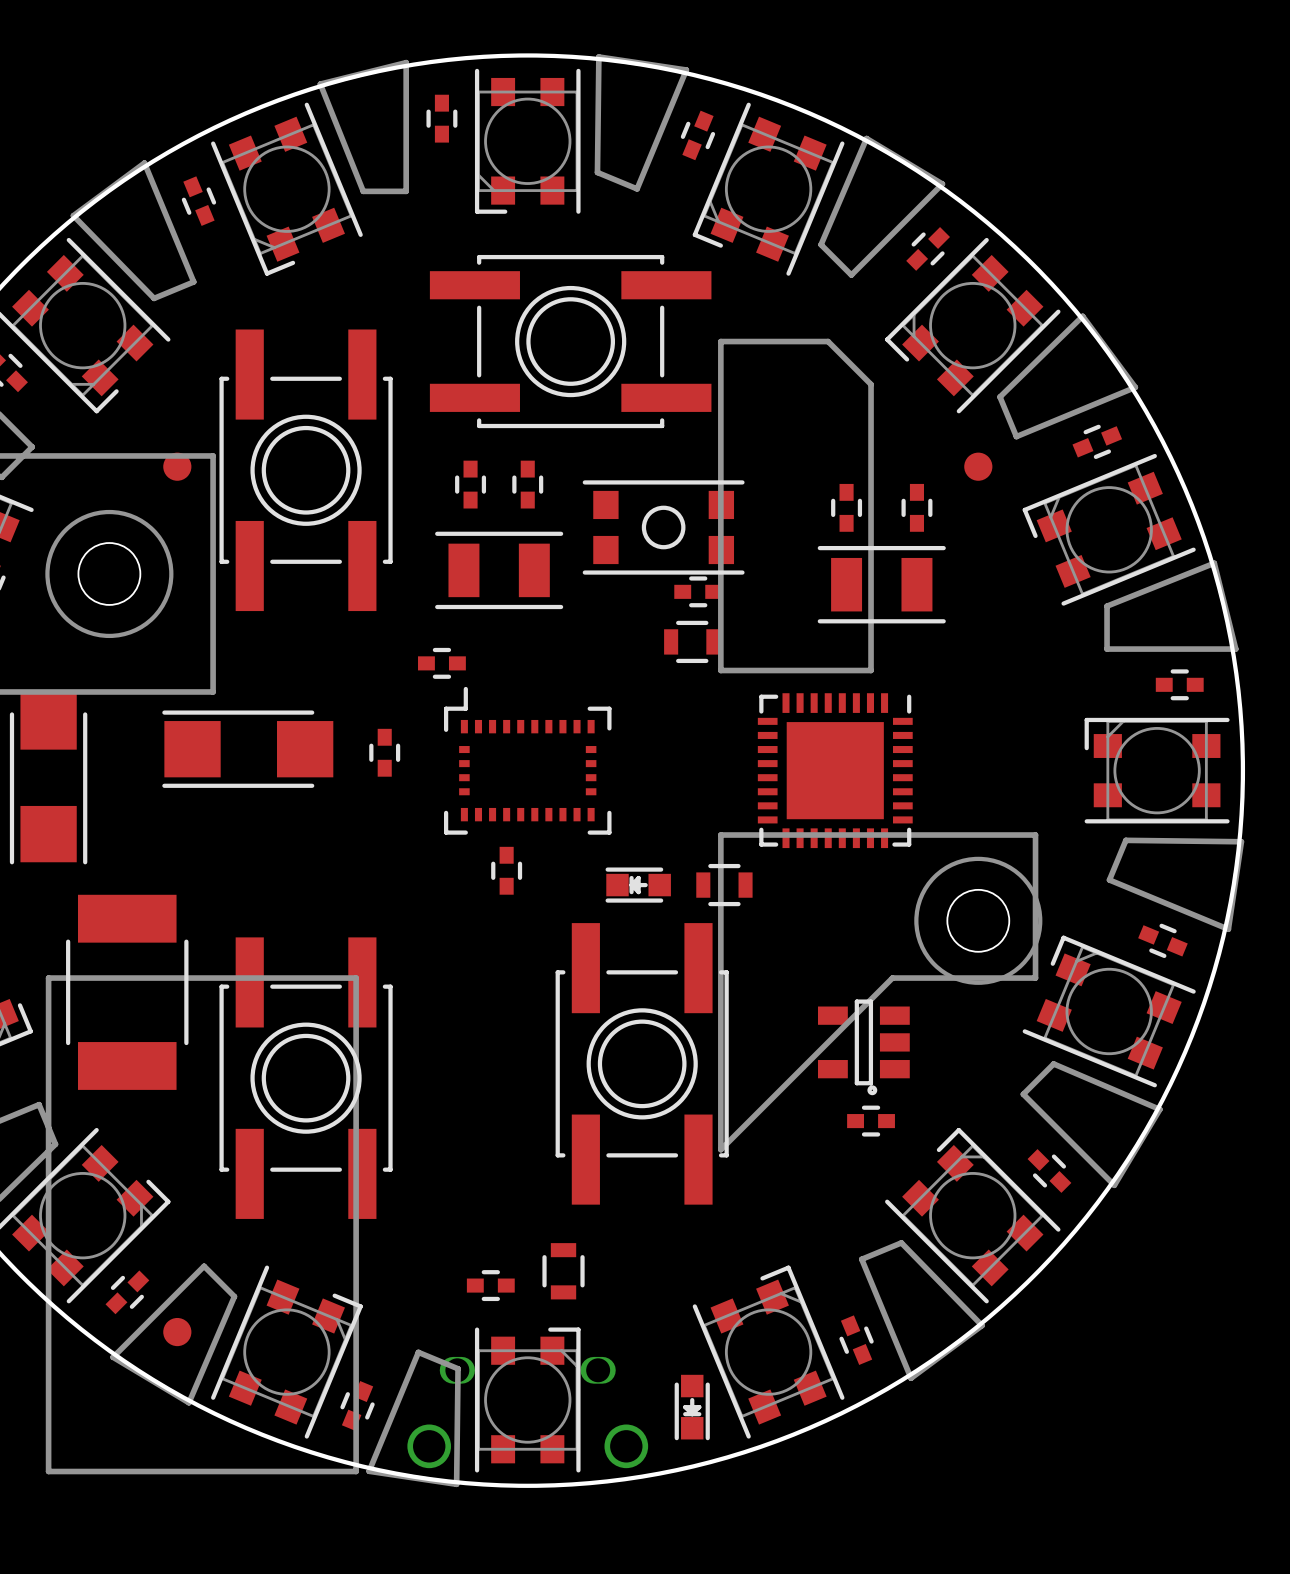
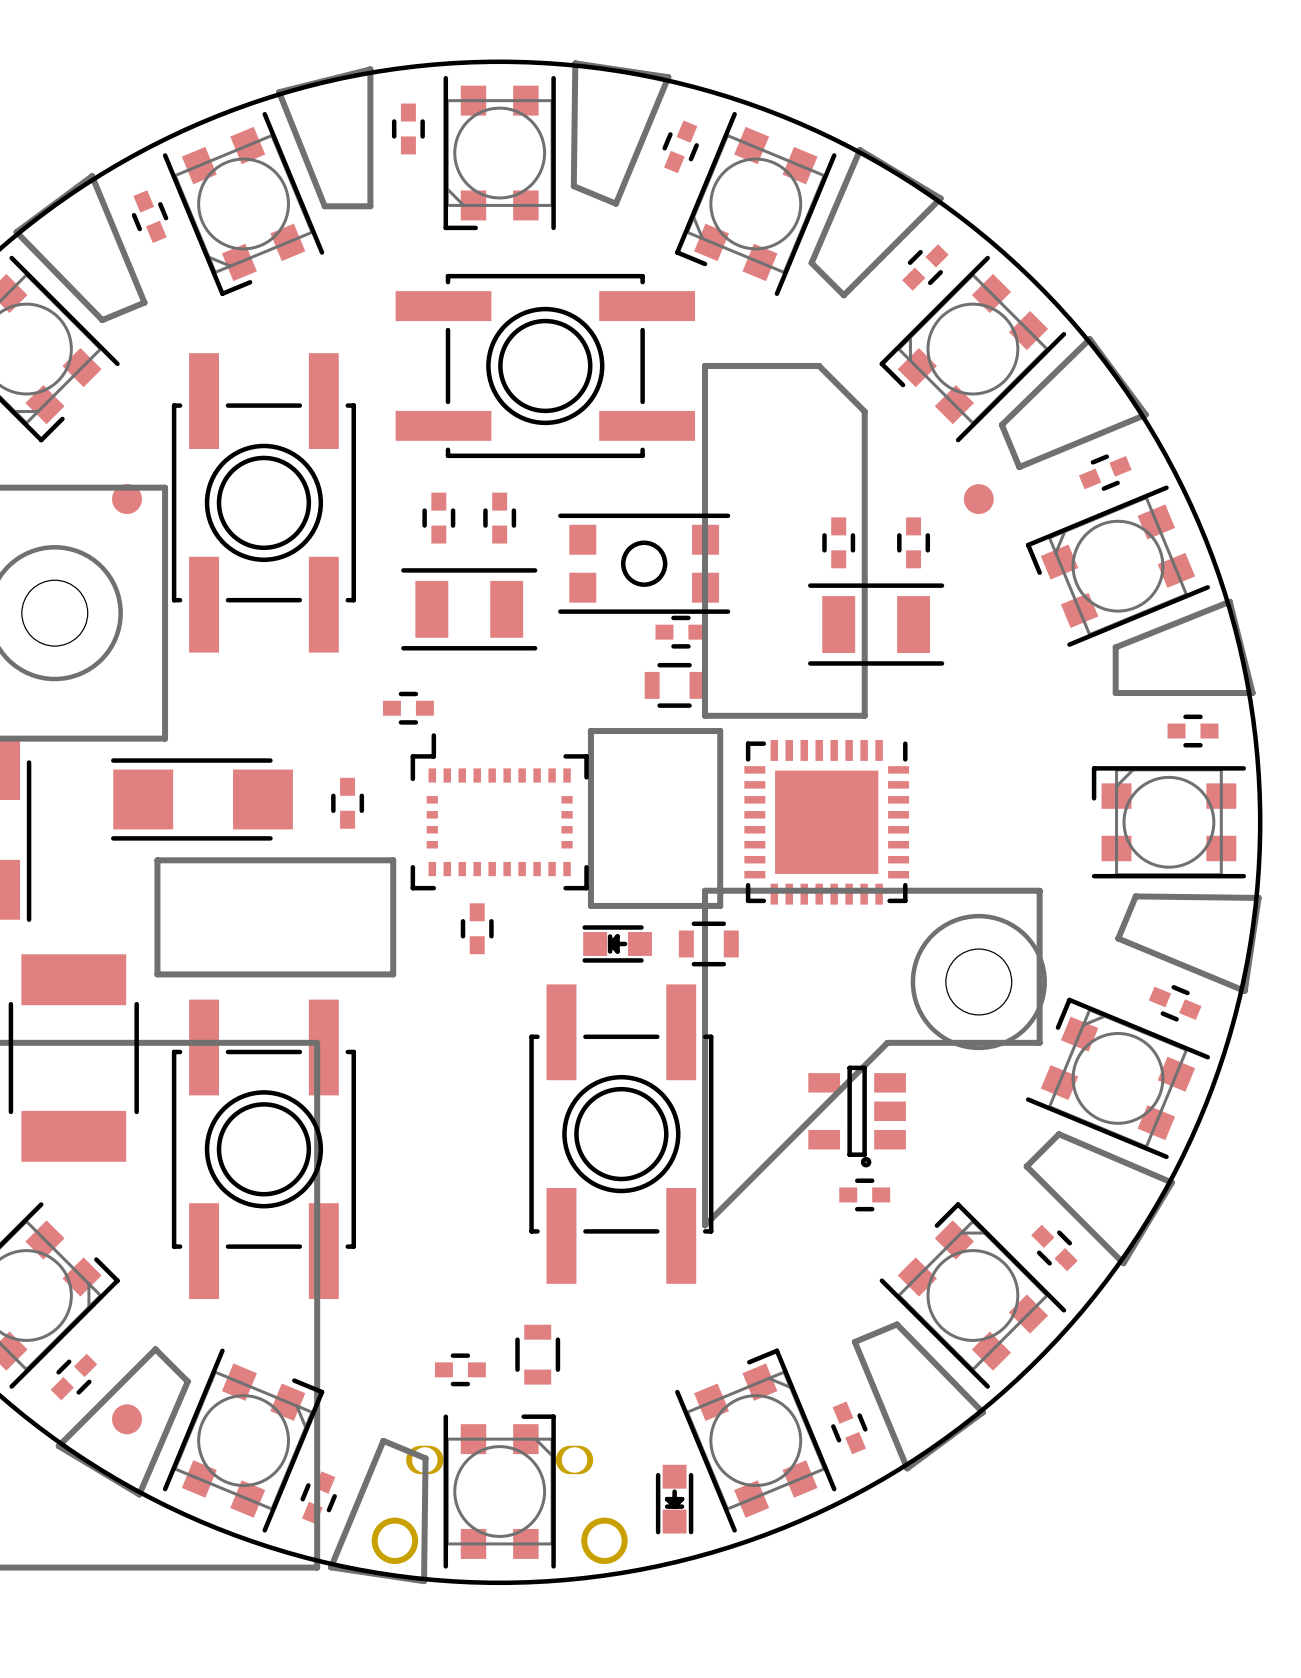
line: none -> (590, 731) (720, 731) (720, 905) (590, 905) (590, 731)
line: none -> (157, 860) (157, 974) (393, 974) (393, 860) (157, 860)

